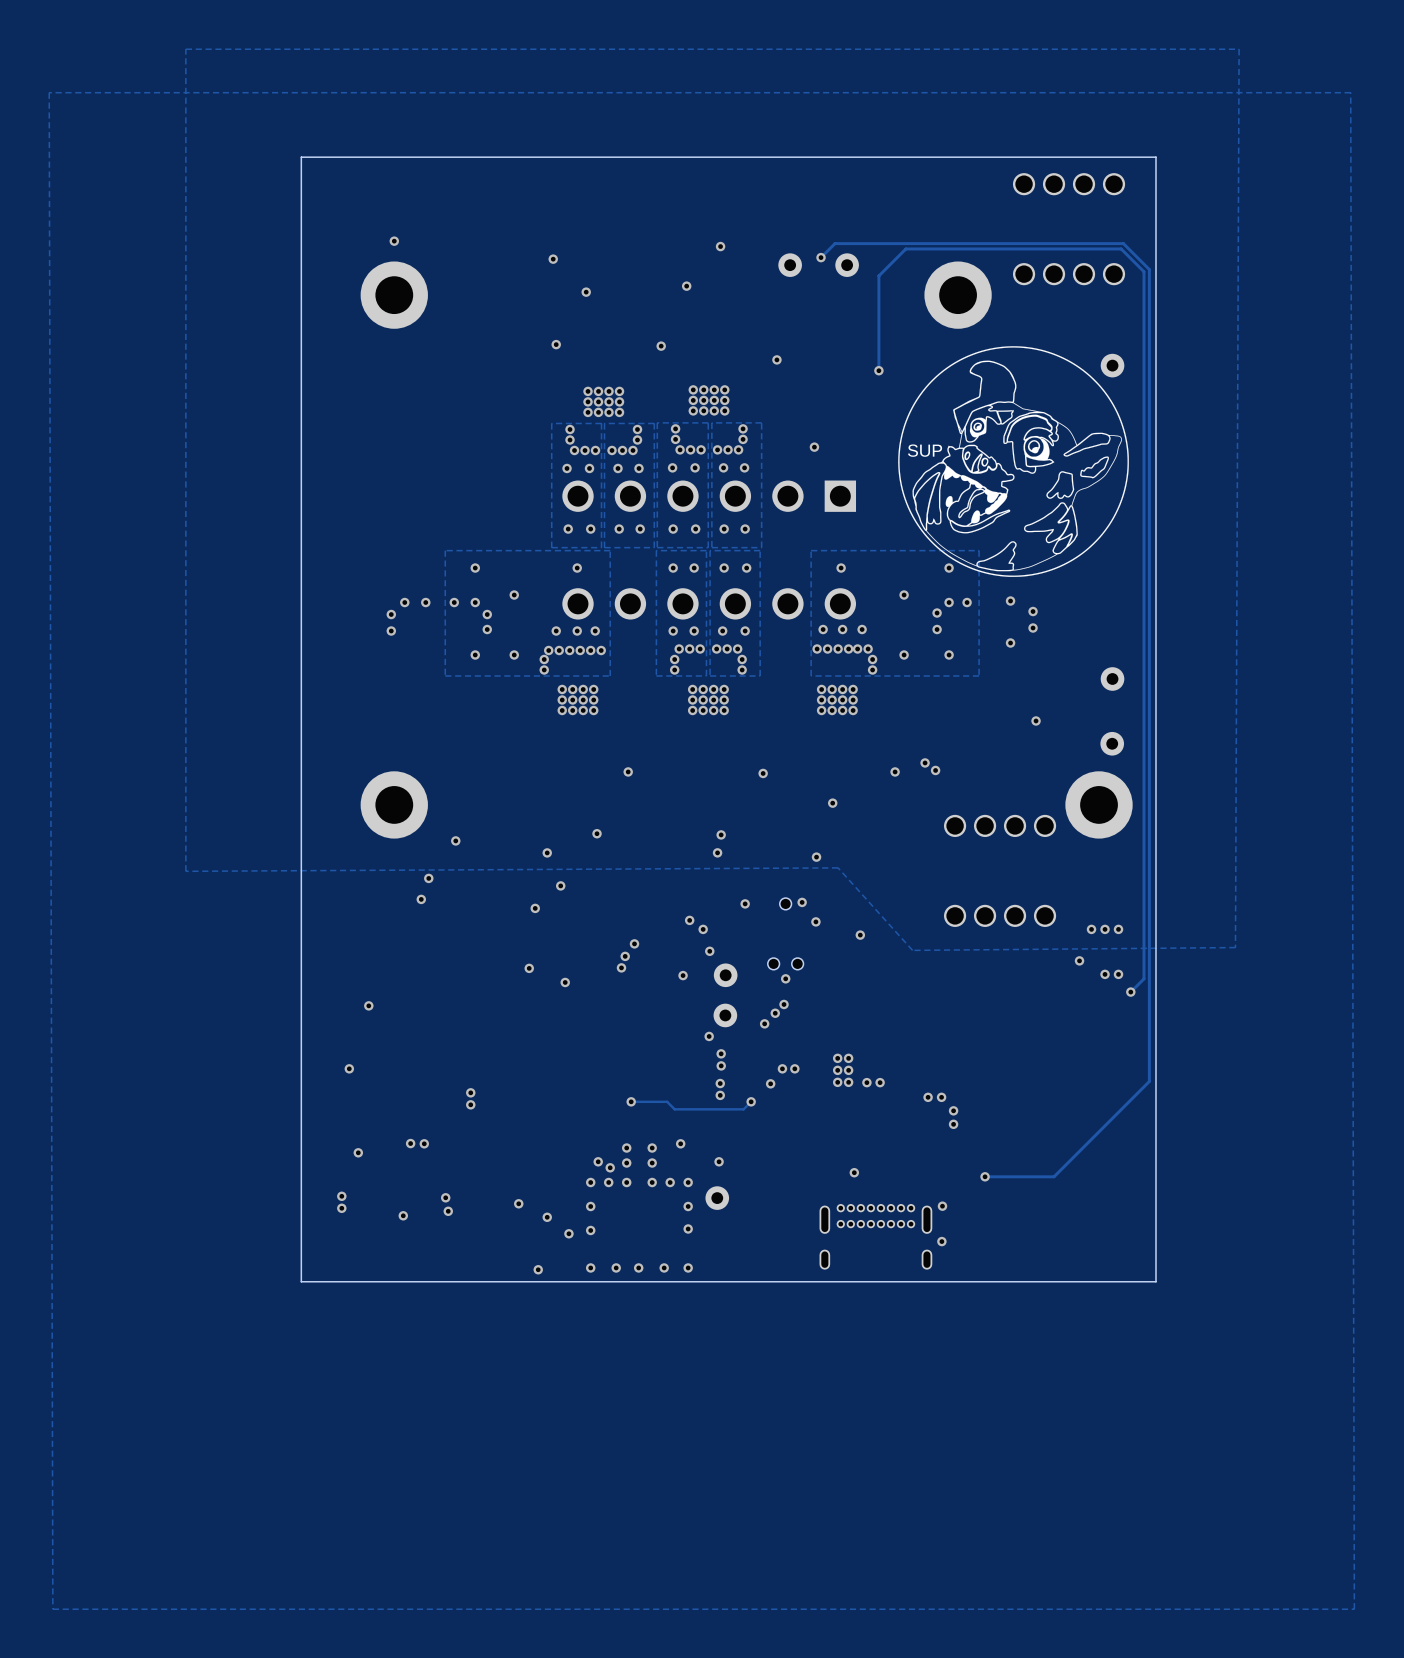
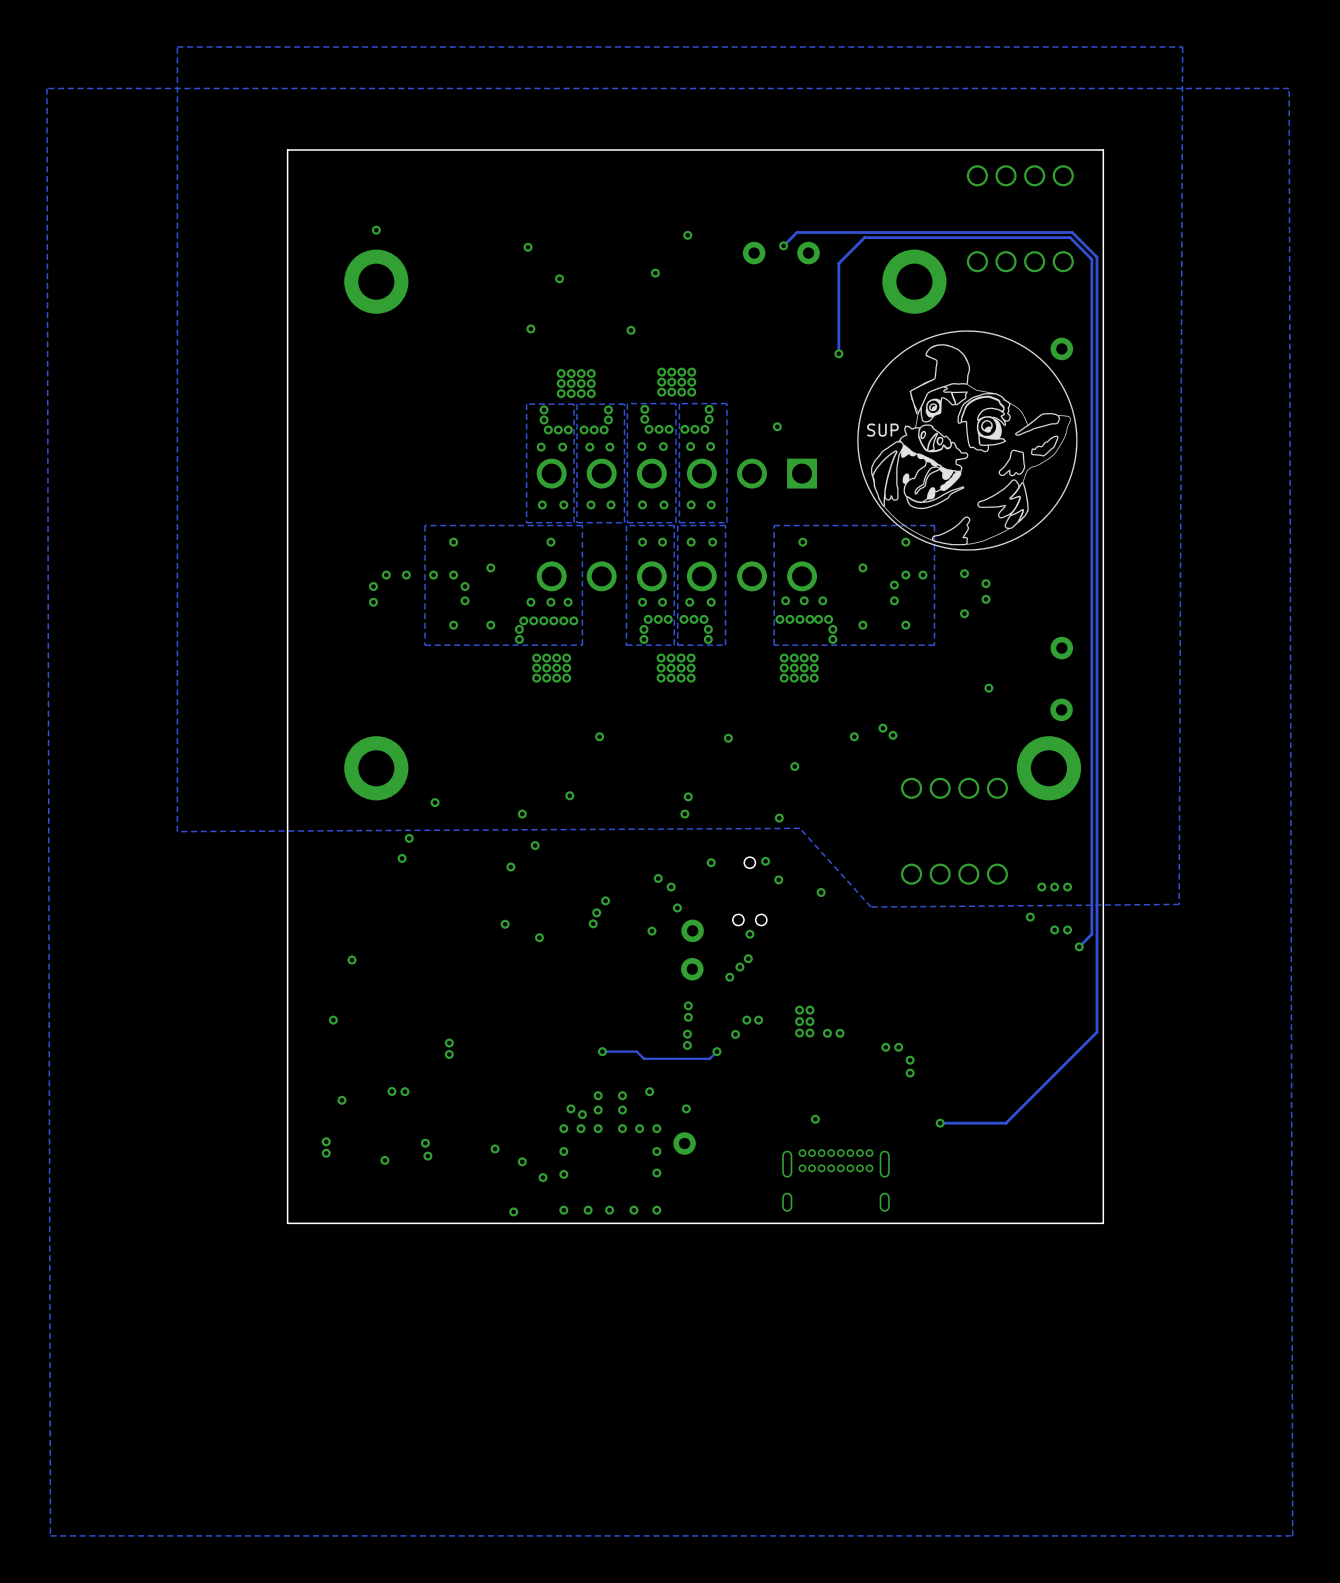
via: (776, 359) -> none
via: (709, 1036) -> none
via: (942, 1206) -> none
via: (941, 1241) -> none

